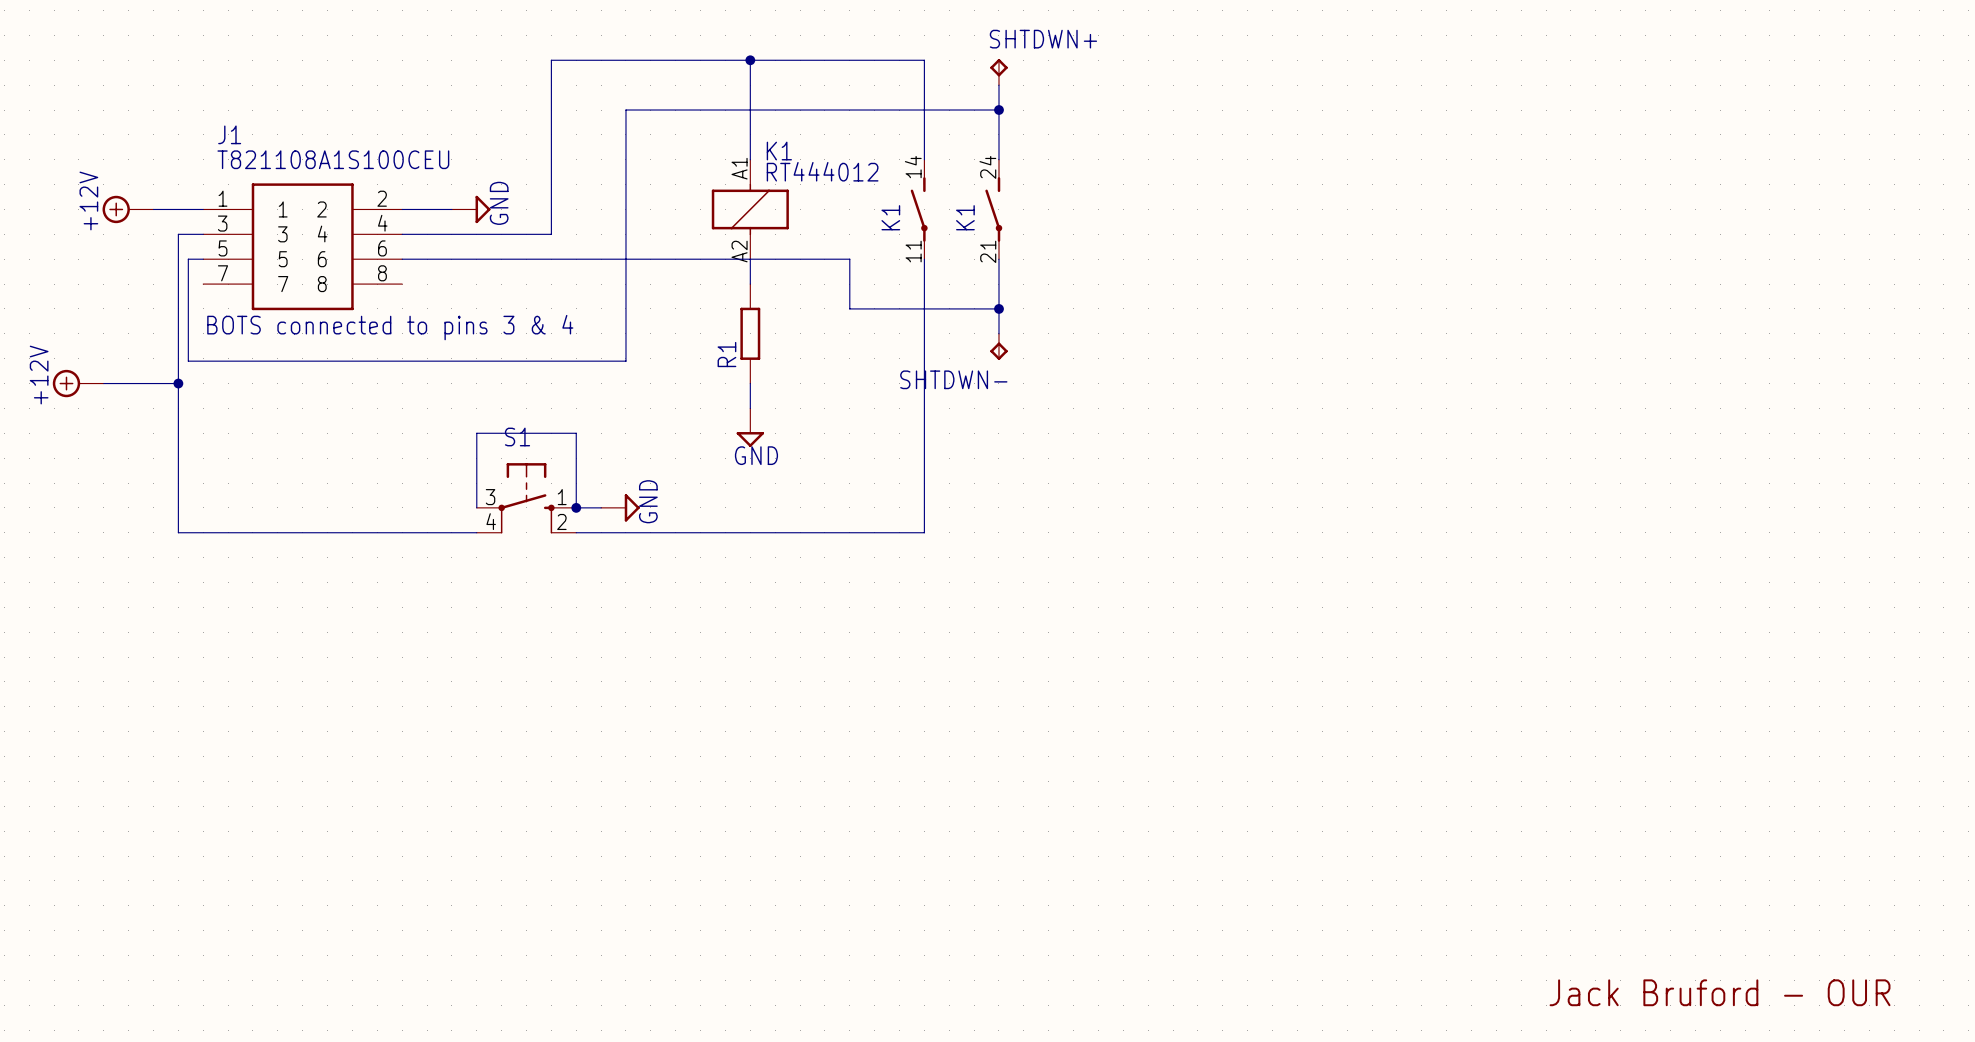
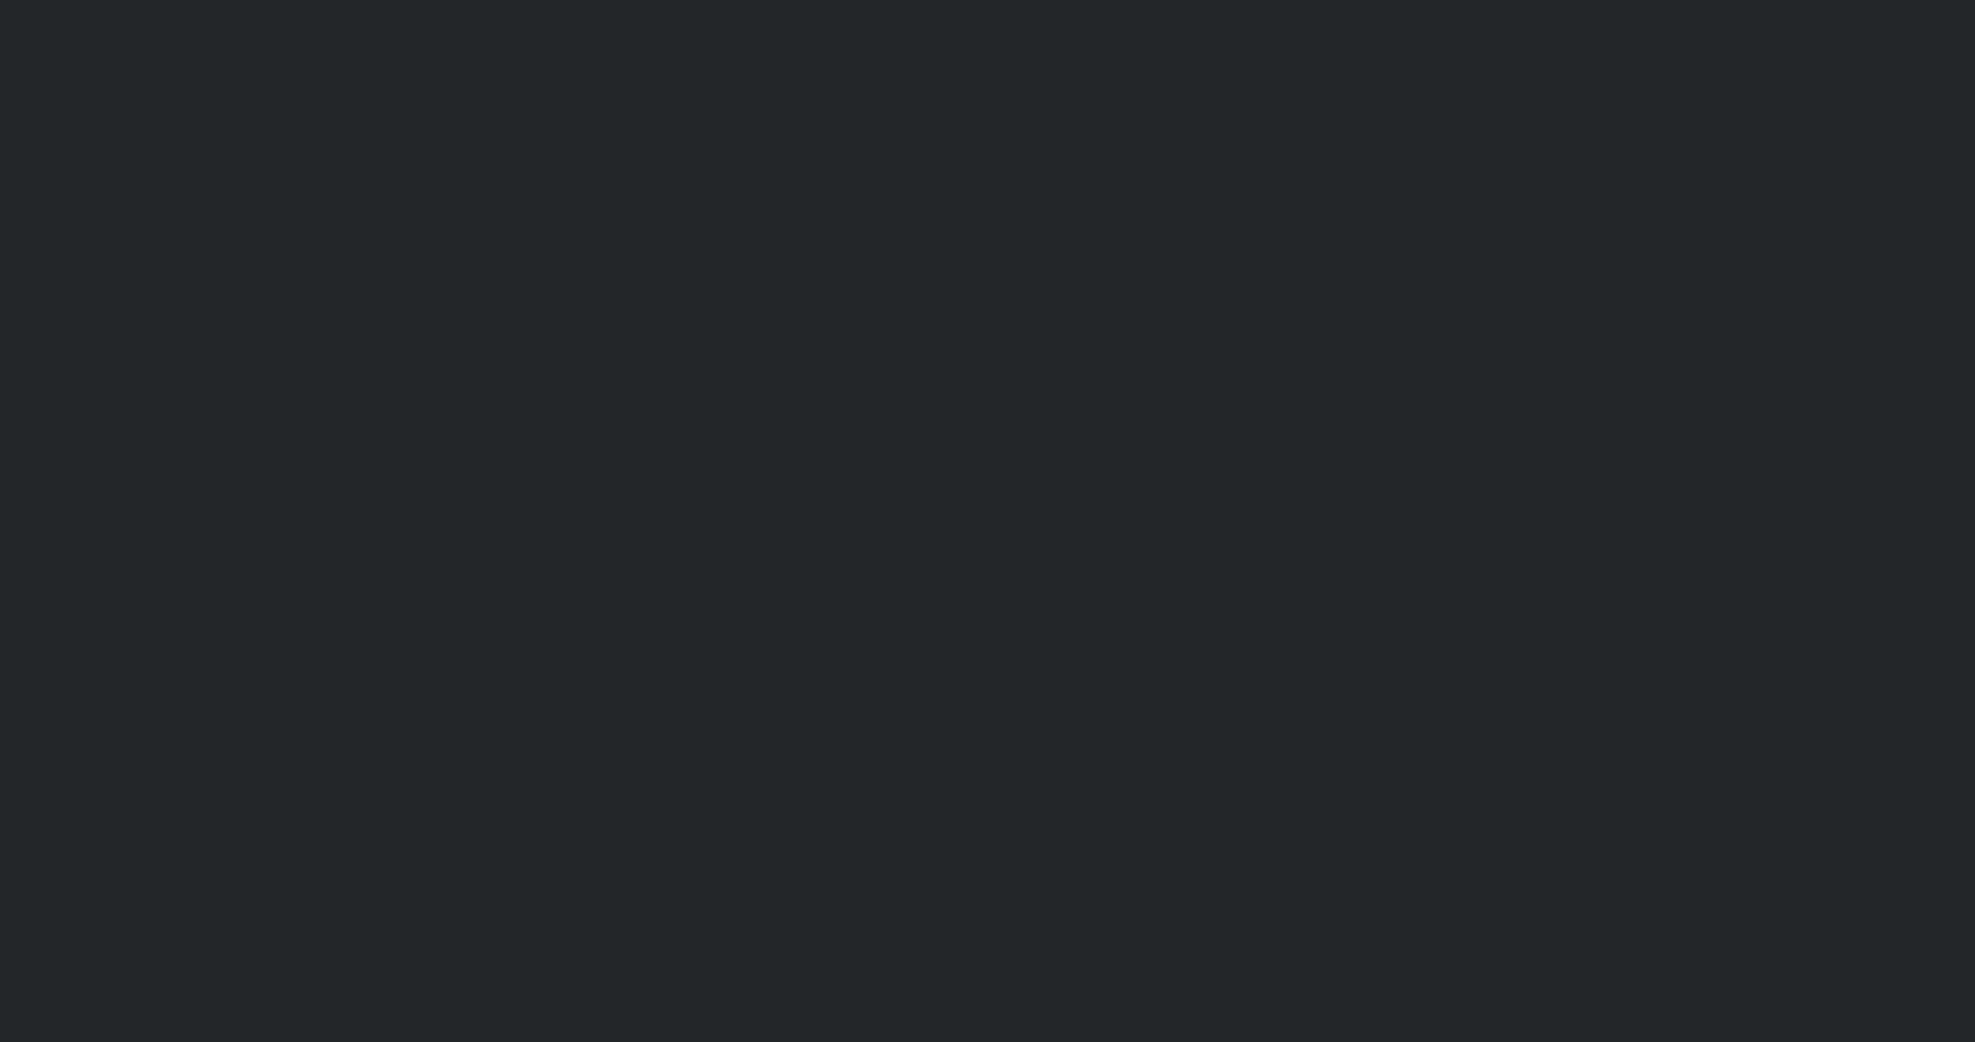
wire: (750, 60) (750, 159) -> none
junction: (750, 60) -> none
SHTDWN+: (998, 72) -> none
wire: (998, 85) (998, 159) -> none
wire: (998, 110) (625, 110) (625, 361) (188, 361) (188, 259) (203, 259) -> none
junction: (998, 110) -> none
wire: (924, 159) (924, 60) (551, 60) (551, 234) (402, 234) -> none
power symbol: +12V (128, 209) -> none
wire: (153, 209) (203, 209) -> none
wire: (402, 209) (451, 209) -> none
power symbol: GND (471, 209) -> none
K1: RT444012 (750, 209) -> none
K1: (919, 209) -> none
K1: (993, 209) -> none
wire: (203, 234) (178, 234) (178, 532) (476, 532) -> none
J1: T821108A1S100CEU (302, 246) -> none
wire: (402, 259) (849, 259) (849, 308) (998, 308) -> none
wire: (750, 259) (750, 284) -> none
wire: (924, 259) (924, 532) (576, 532) -> none
wire: (998, 259) (998, 333) -> none
junction: (998, 308) -> none
text: BOTS connected to pins 3 & 4 (390, 327) -> none
R1: (750, 333) -> none
SHTDWN-: (998, 346) -> none
power symbol: +12V (78, 383) -> none
wire: (103, 383) (178, 383) -> none
junction: (178, 383) -> none
wire: (750, 383) (750, 408) -> none
power symbol: GND (750, 427) -> none
S1: (526, 498) -> none
wire: (476, 507) (476, 433) (576, 433) (576, 507) (601, 507) -> none
junction: (576, 507) -> none
power symbol: GND (620, 507) -> none
text: Jack Bruford - OUR (1720, 992) -> none

